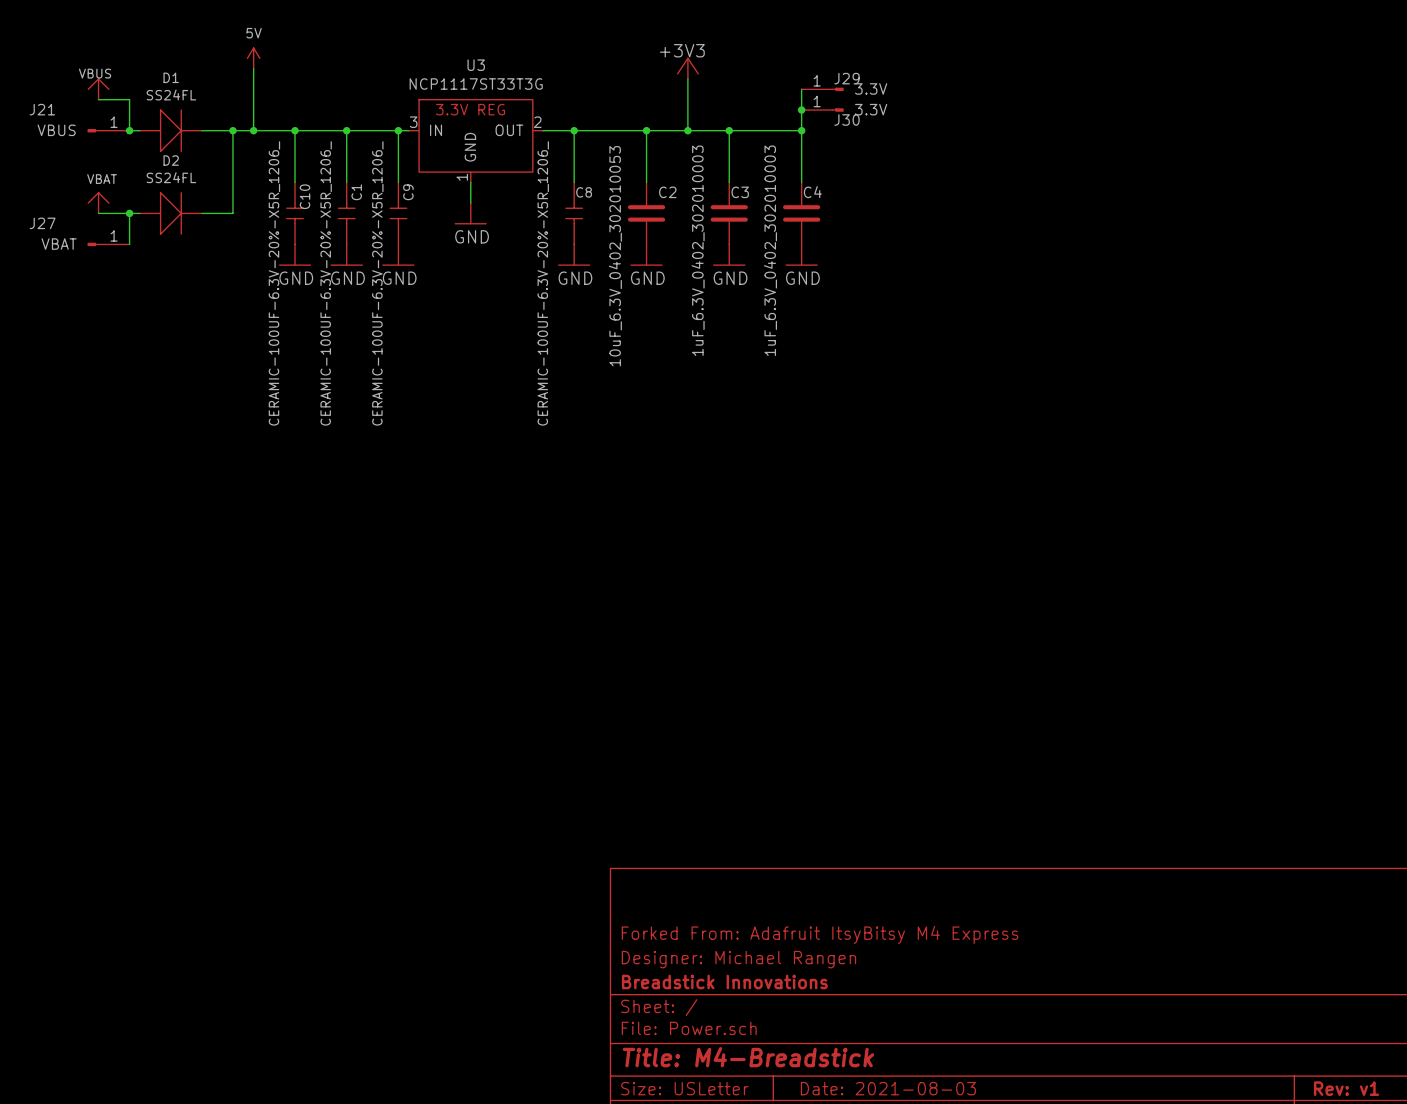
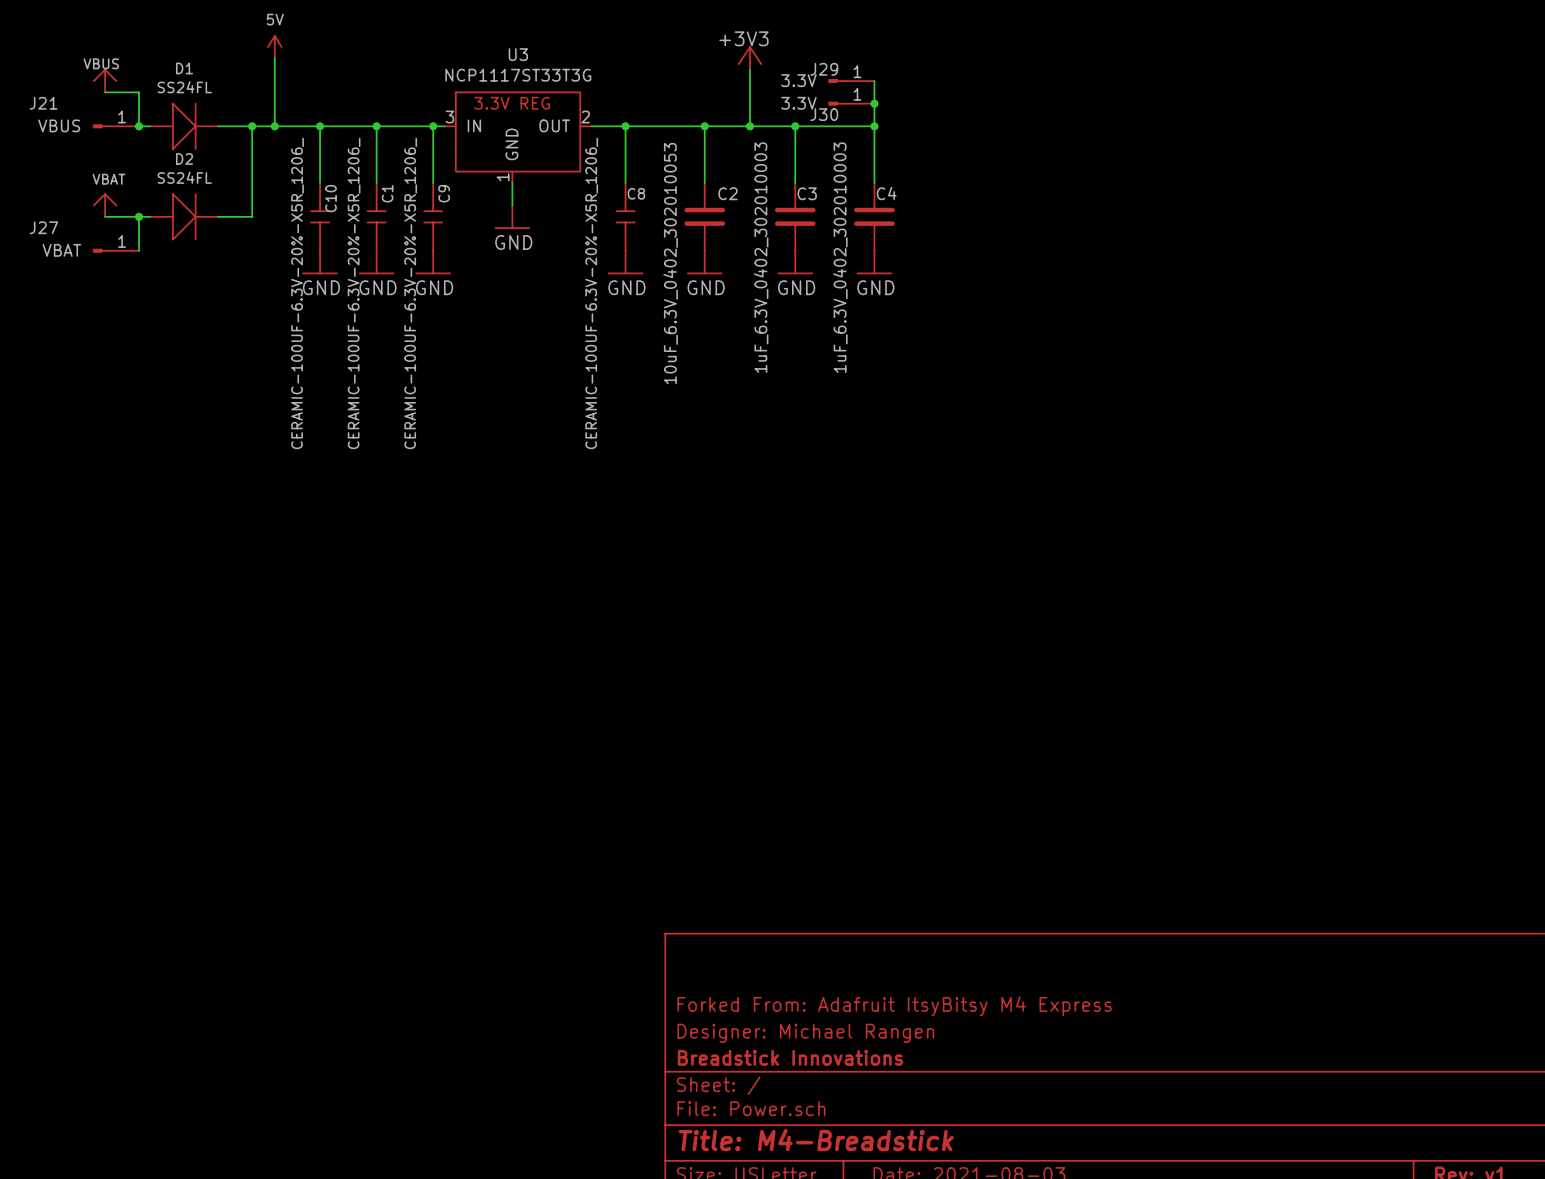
J29 name position: J29 (847, 78) -> J29 (824, 69)
J29 position: (822, 89) -> (851, 81)
J29 rotation: 0° (837, 89) -> 180° (834, 81)
J30 position: (822, 110) -> (851, 103)
J30 rotation: 0° (837, 110) -> 180° (834, 103)
J30 name position: J30 (847, 119) -> J30 (824, 114)

